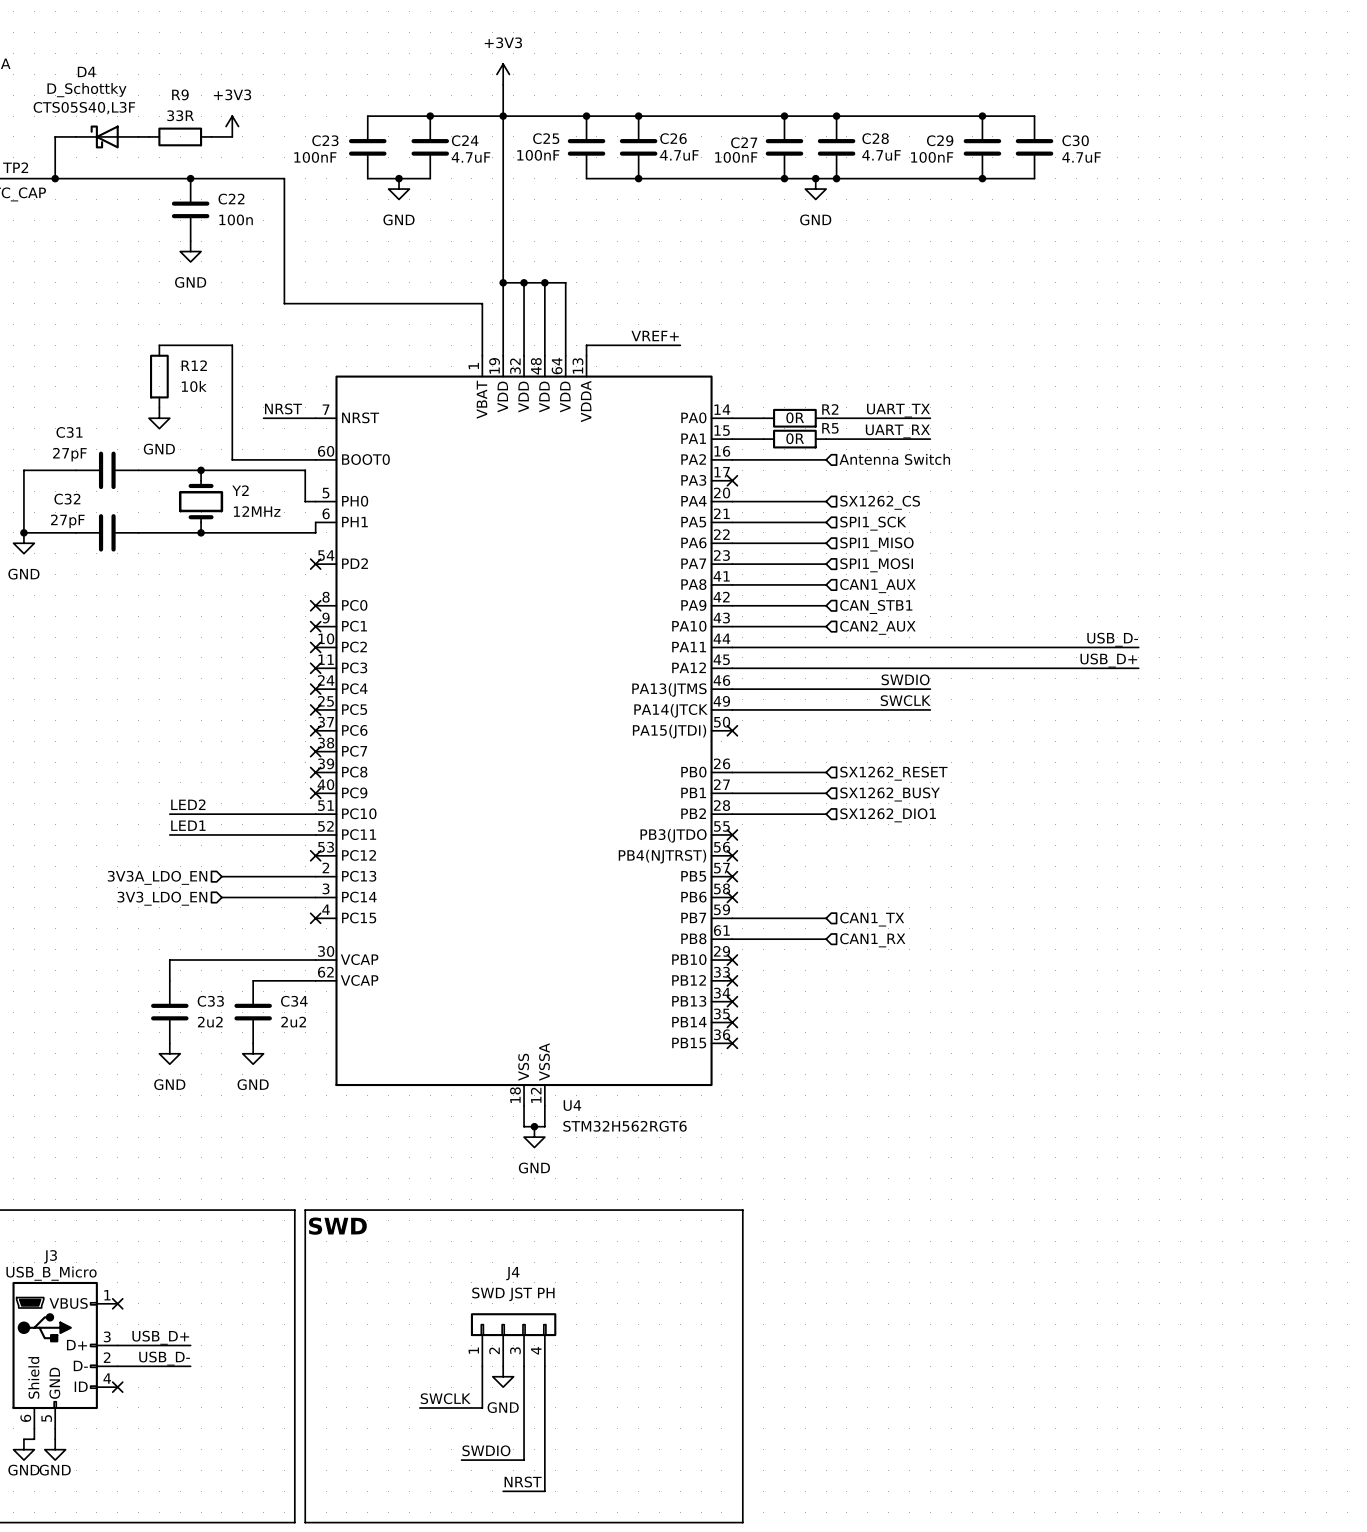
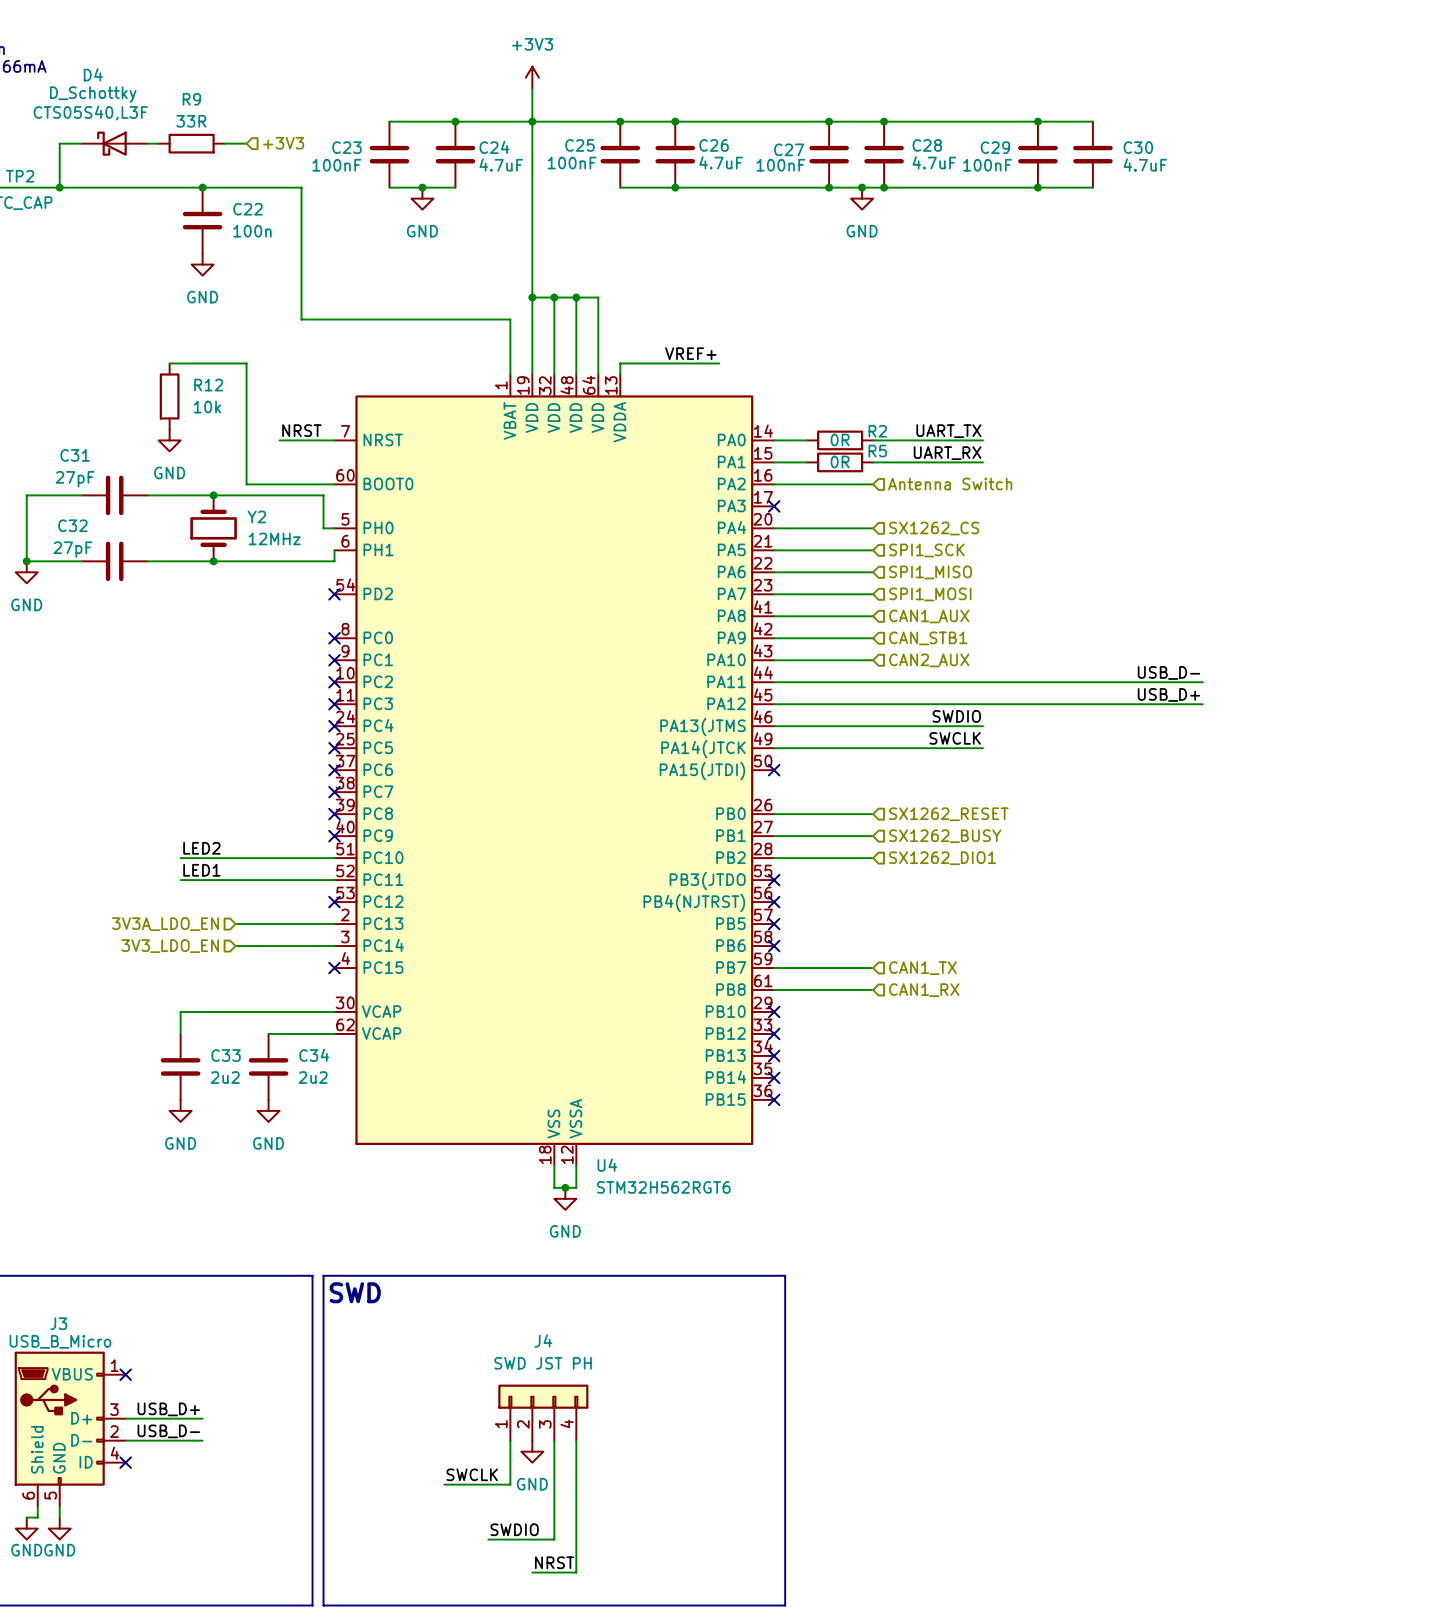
power symbol: +3V3 (232, 126) -> none
hierarchical label: none -> +3V3 (283, 143)

